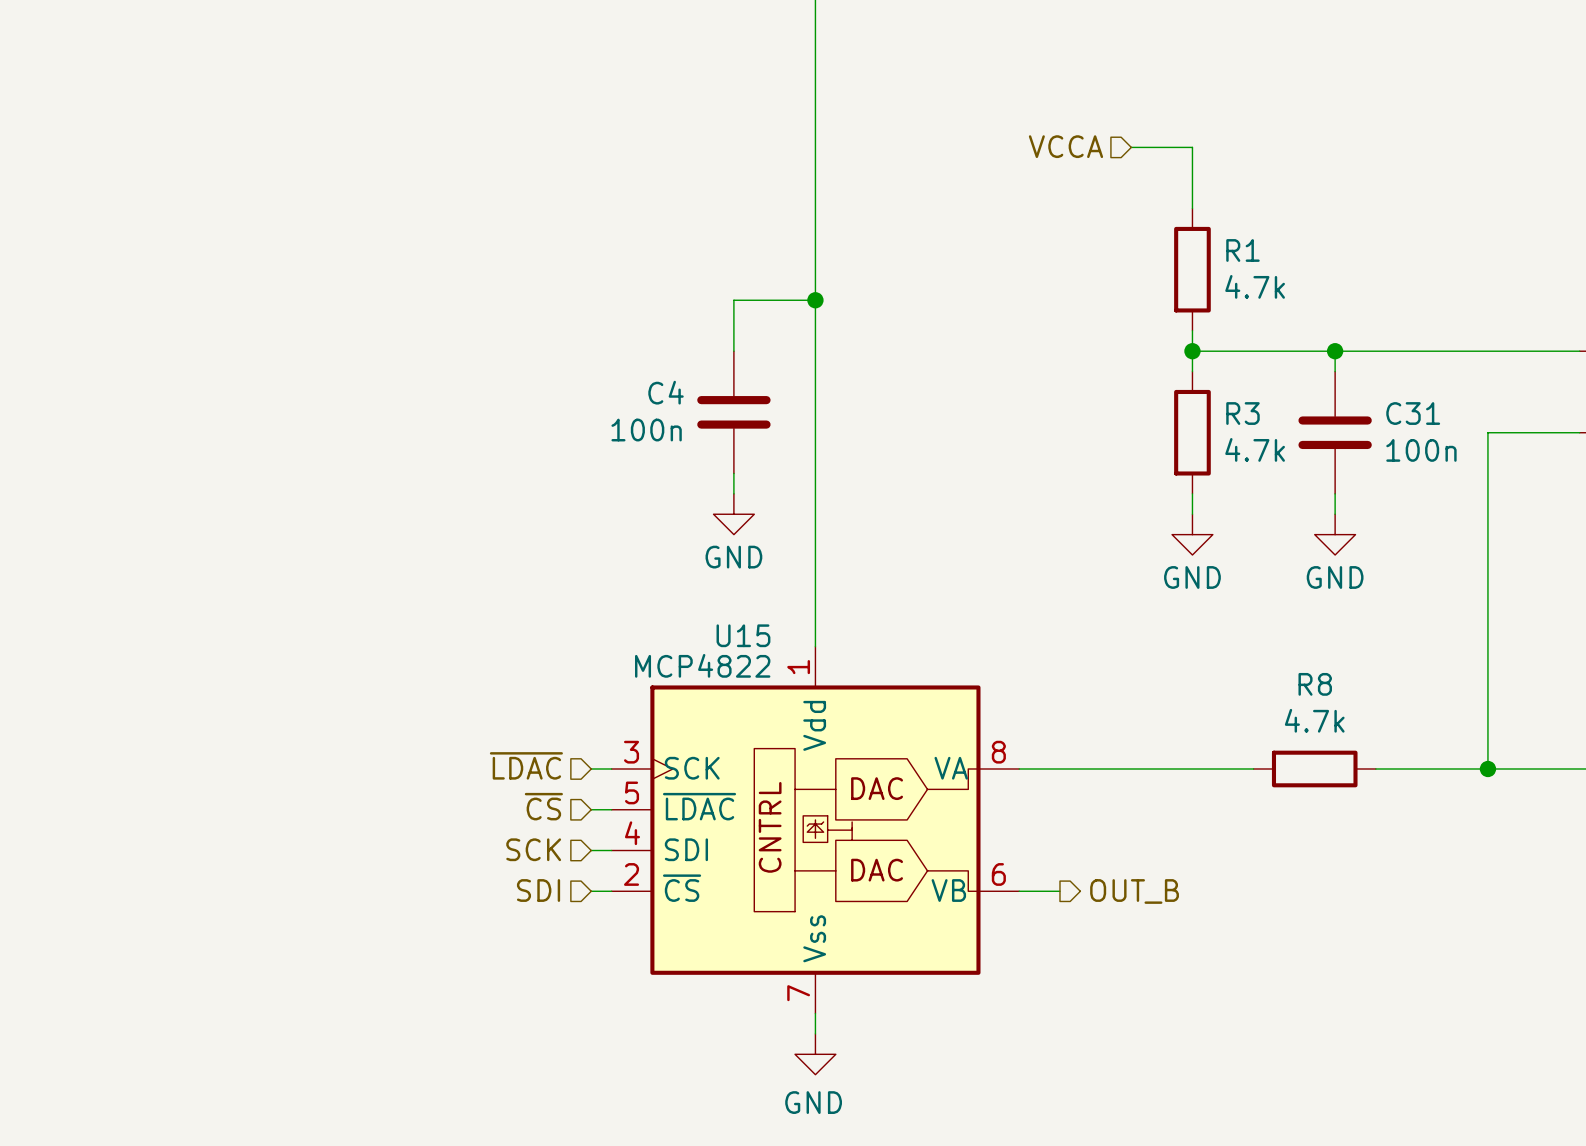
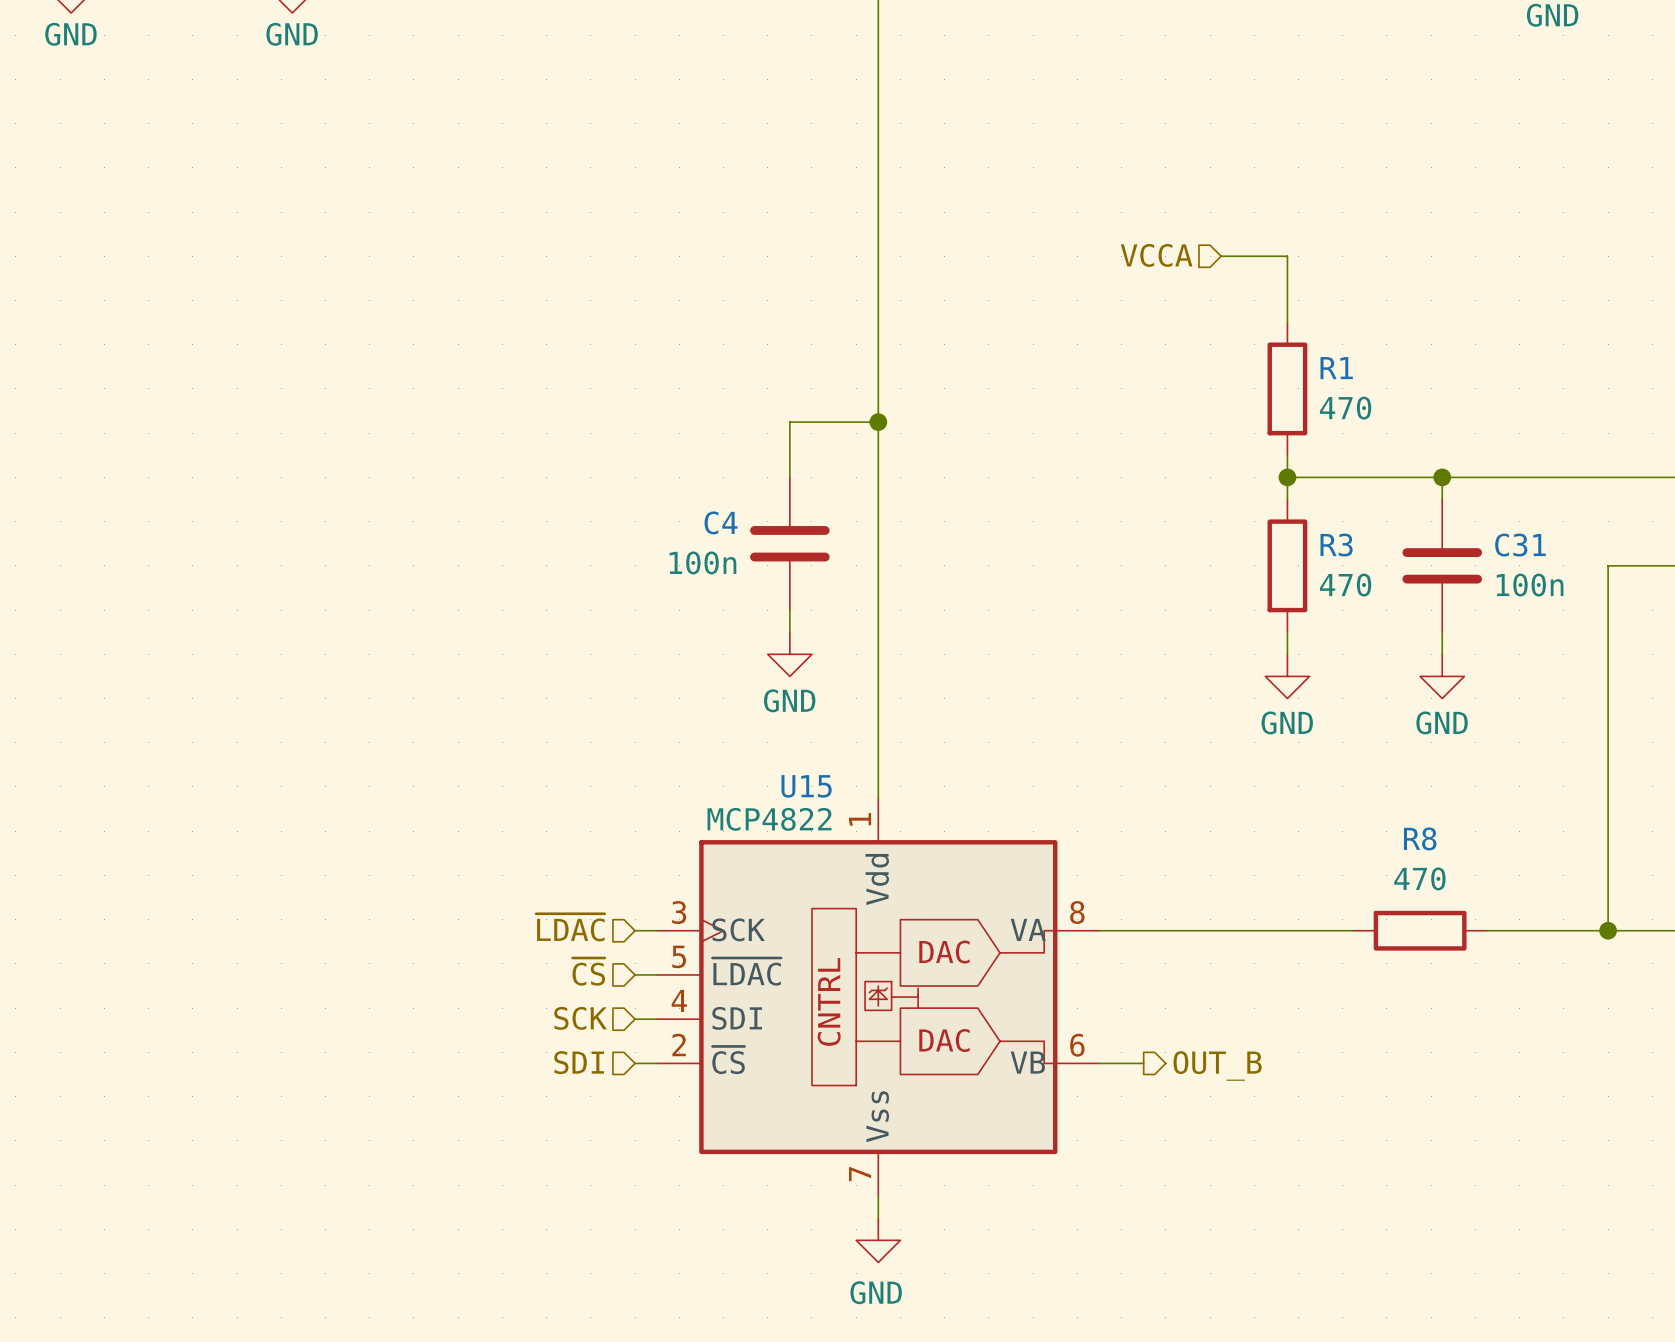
R1 value: 4.7k (1255, 286) -> 470 (1345, 408)
R3 value: 4.7k (1255, 449) -> 470 (1345, 585)
R8 value: 4.7k (1314, 720) -> 470 (1419, 878)

